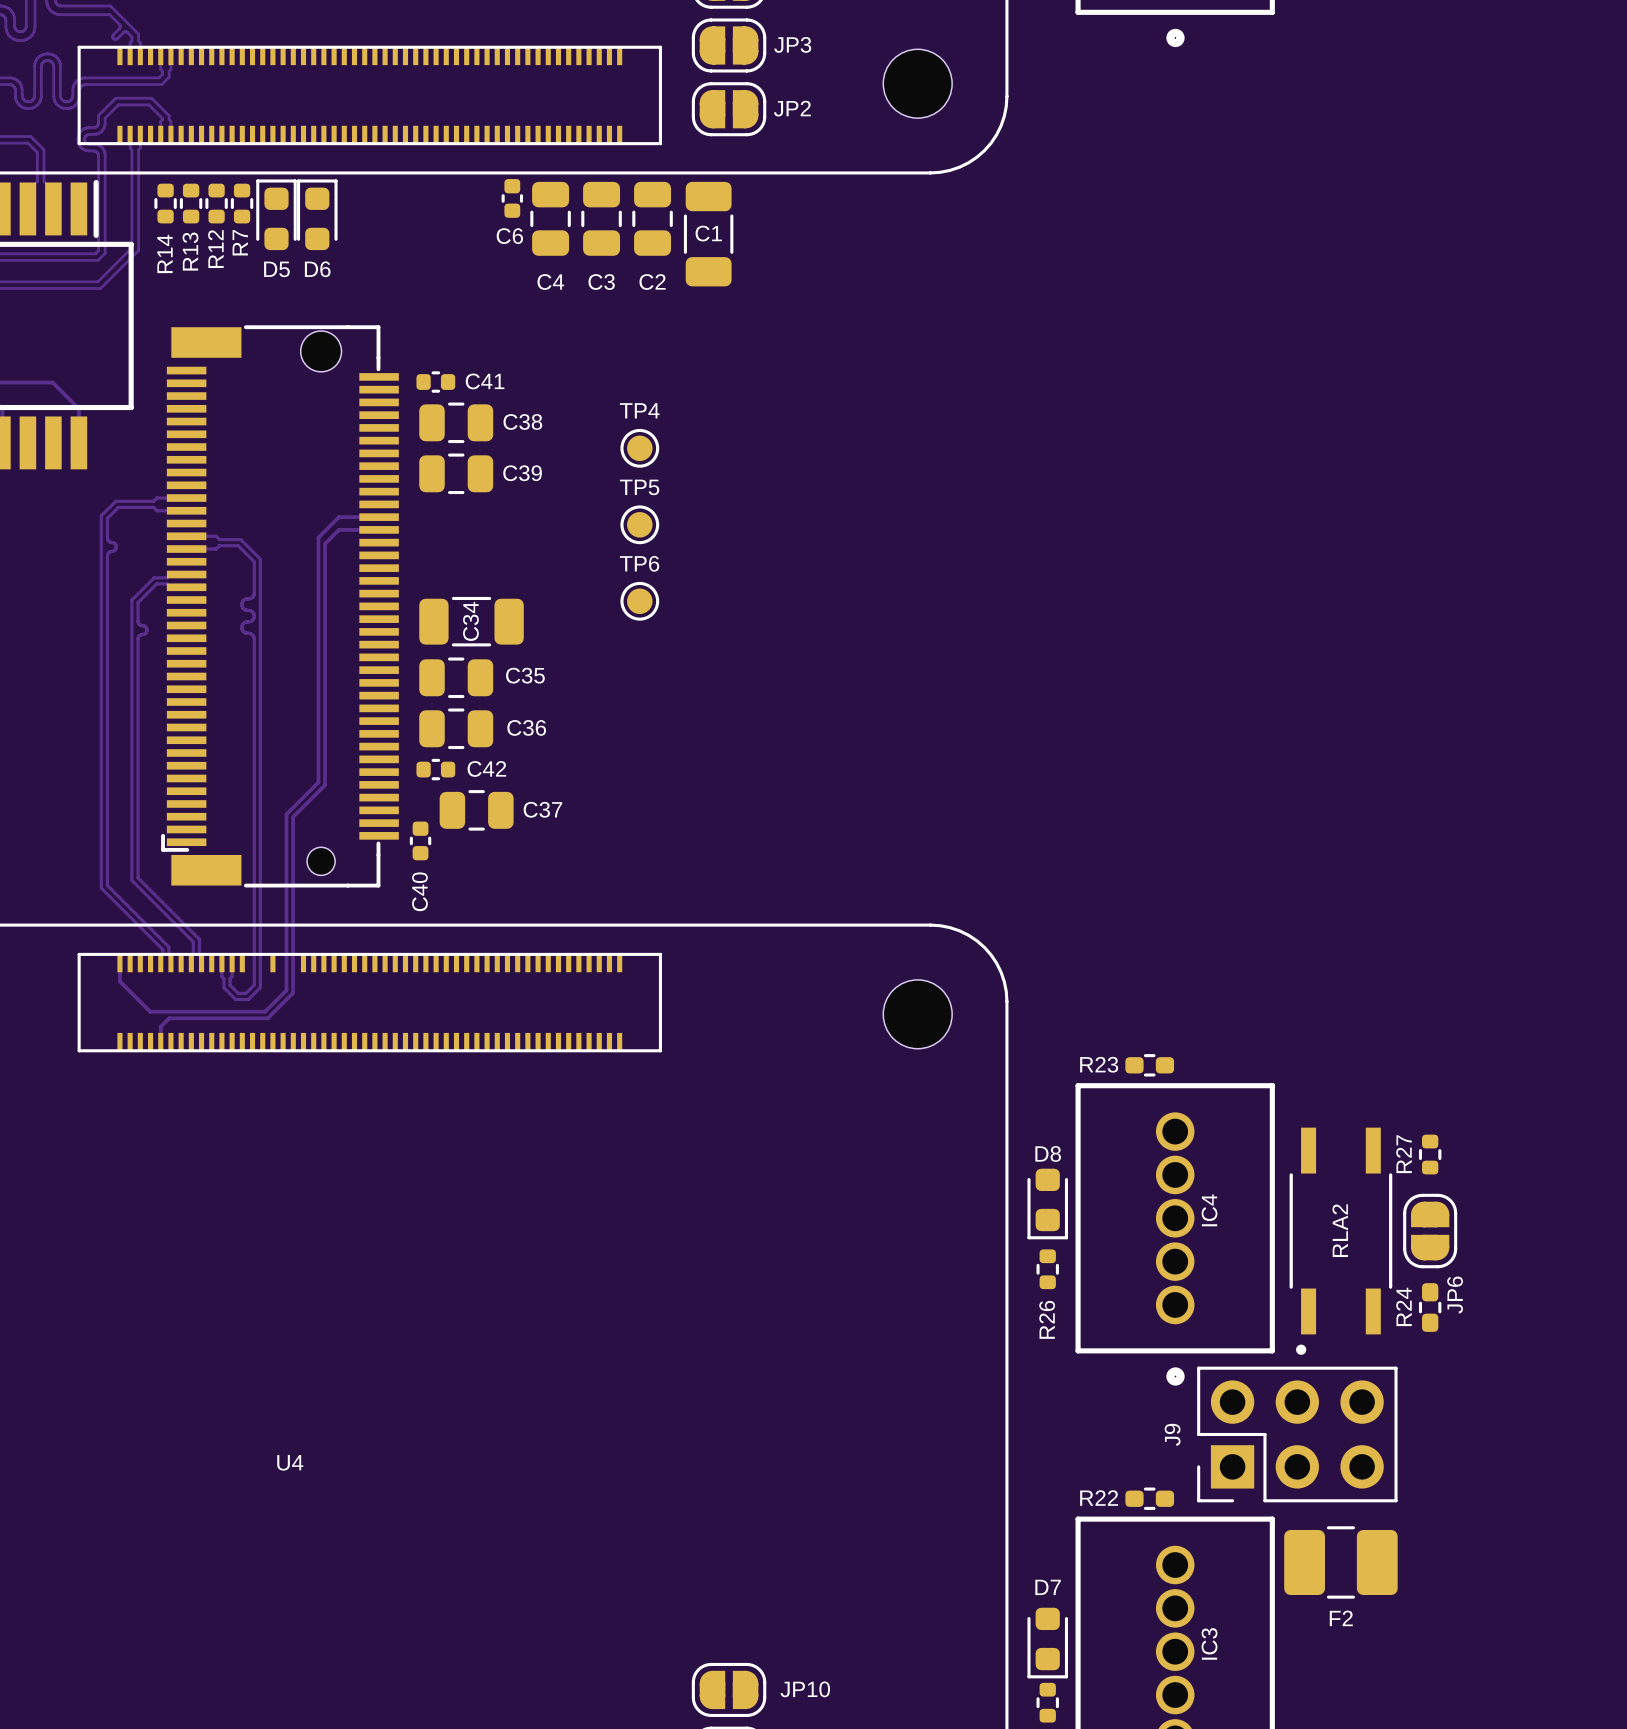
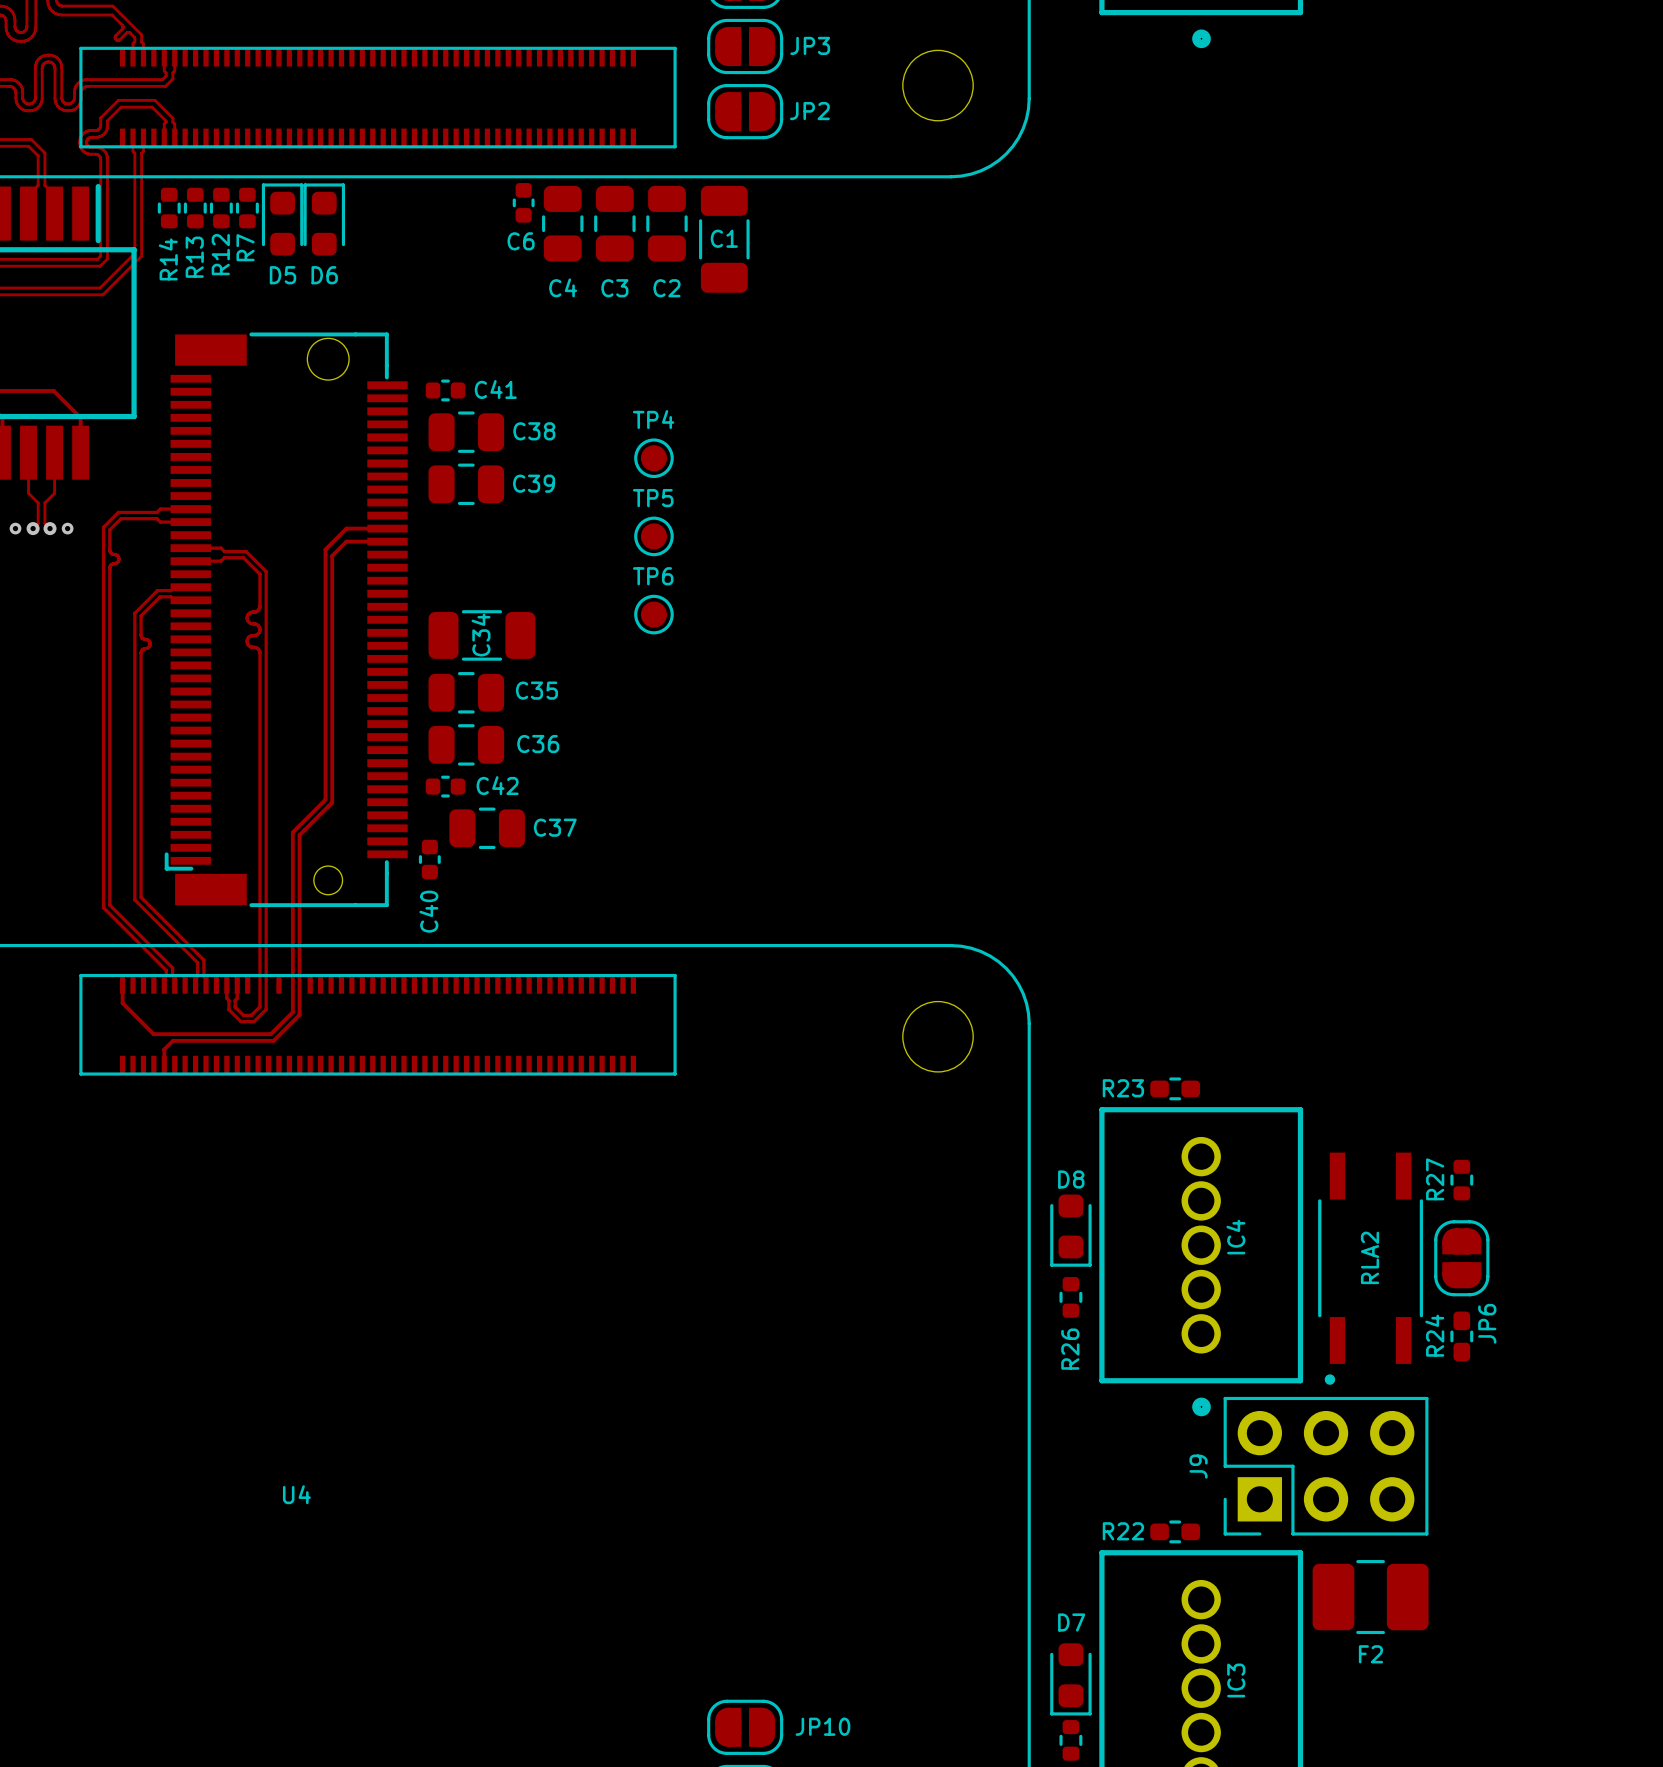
track: none -> (28, 452) (28, 493) (38, 502) (38, 523) (33, 528)
track: none -> (54, 452) (54, 493) (44, 502) (44, 523) (50, 528)
via: none -> (15, 528)
via: none -> (33, 528)
via: none -> (50, 528)
via: none -> (67, 528)

